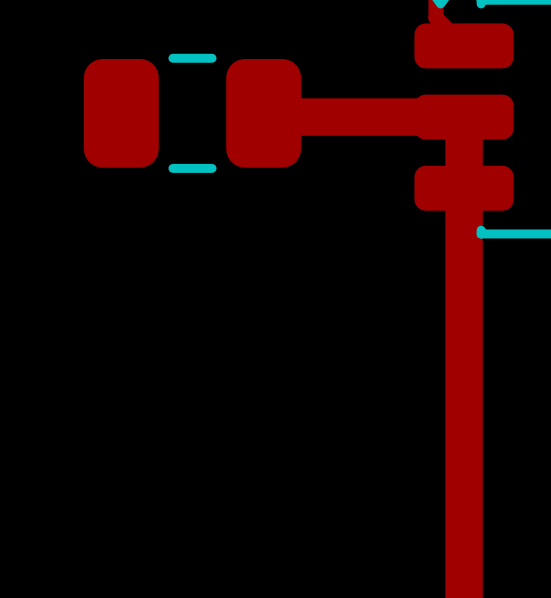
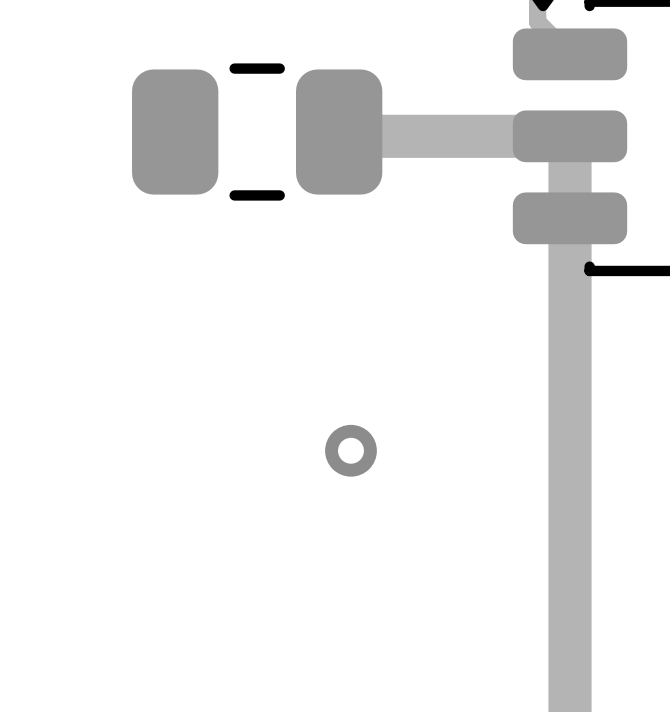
via: none -> (350, 450)

